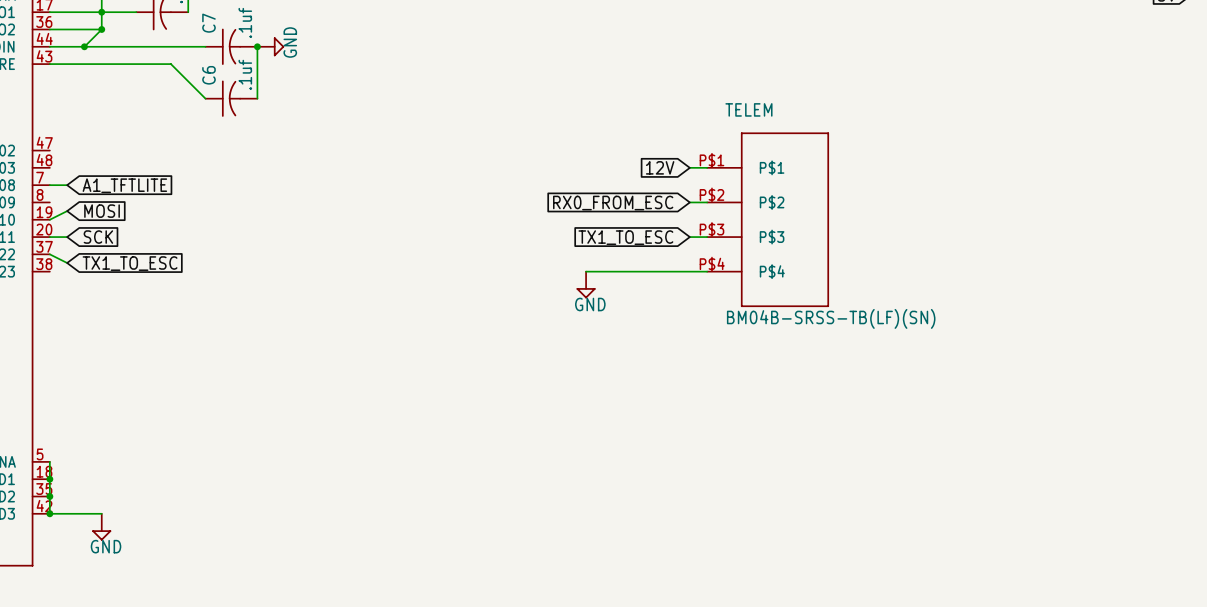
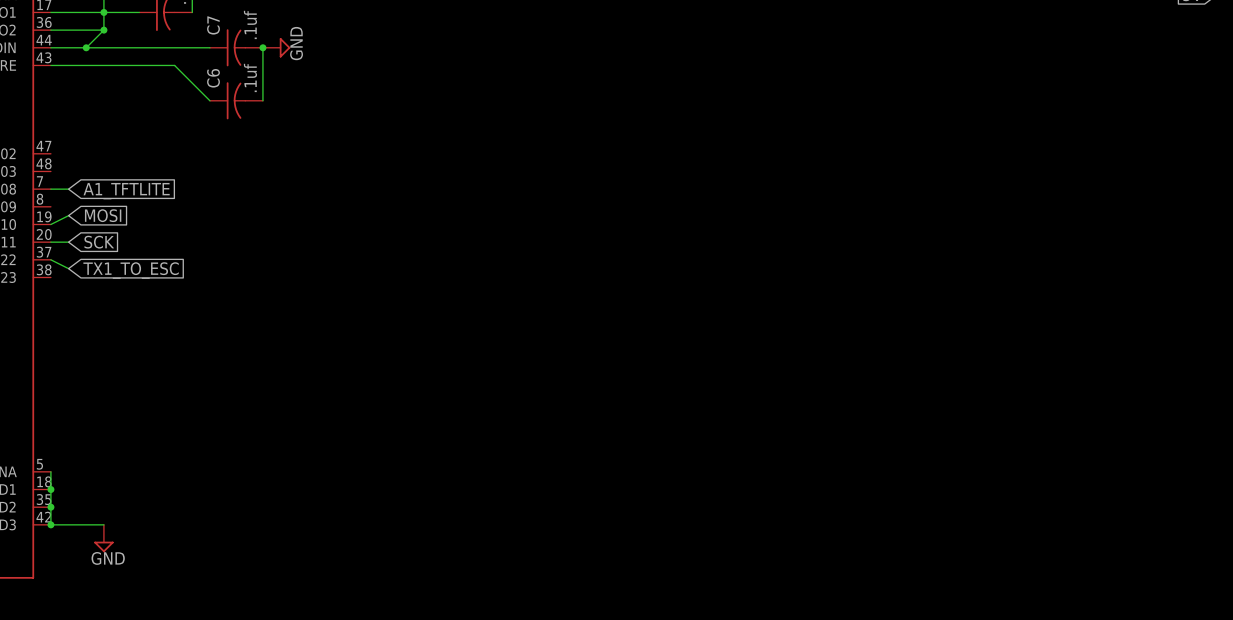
global label: 12V (660, 167) -> none
wire: (689, 167) (707, 167) -> none
wire: (689, 202) (707, 202) -> none
global label: RX0_FROM_ESC (613, 203) -> none
TELEM: BM04B-SRSS-TB(LF)(SN) (767, 219) -> none
global label: TX1_TO_ESC (625, 237) -> none
wire: (689, 237) (707, 237) -> none
wire: (586, 271) (707, 271) -> none
power symbol: GND (586, 285) -> none

